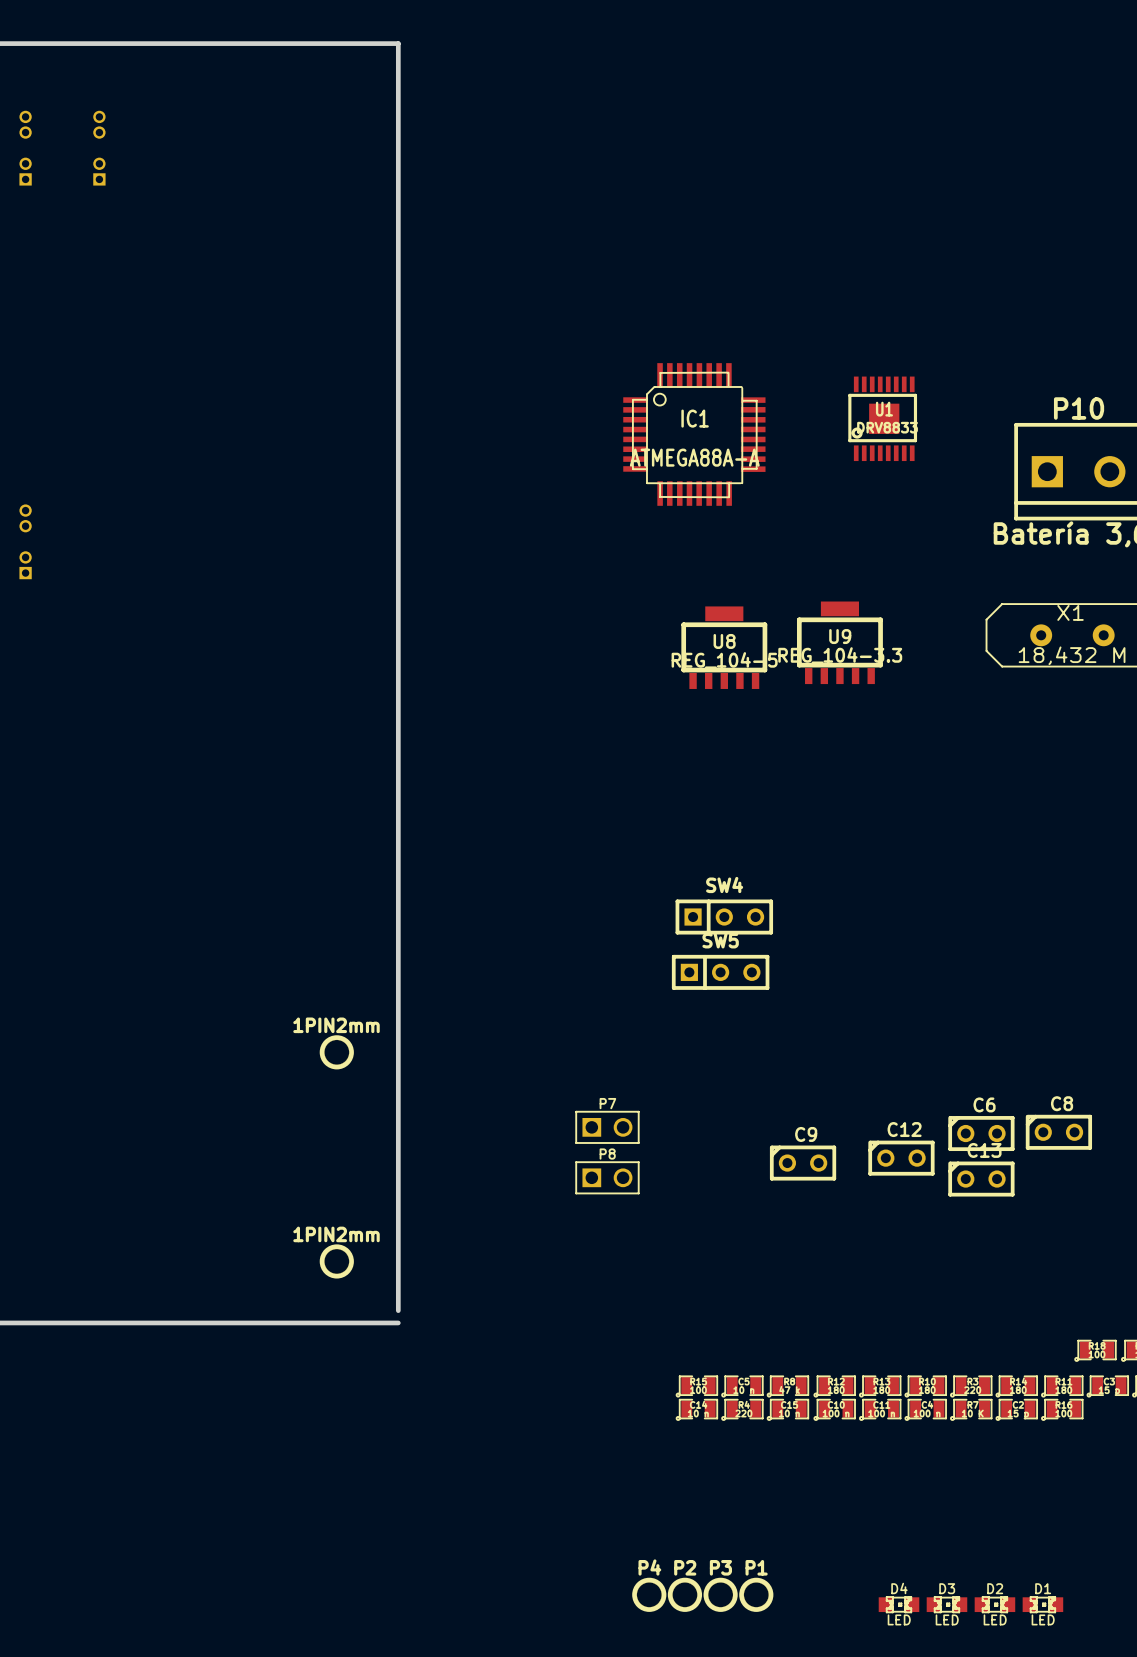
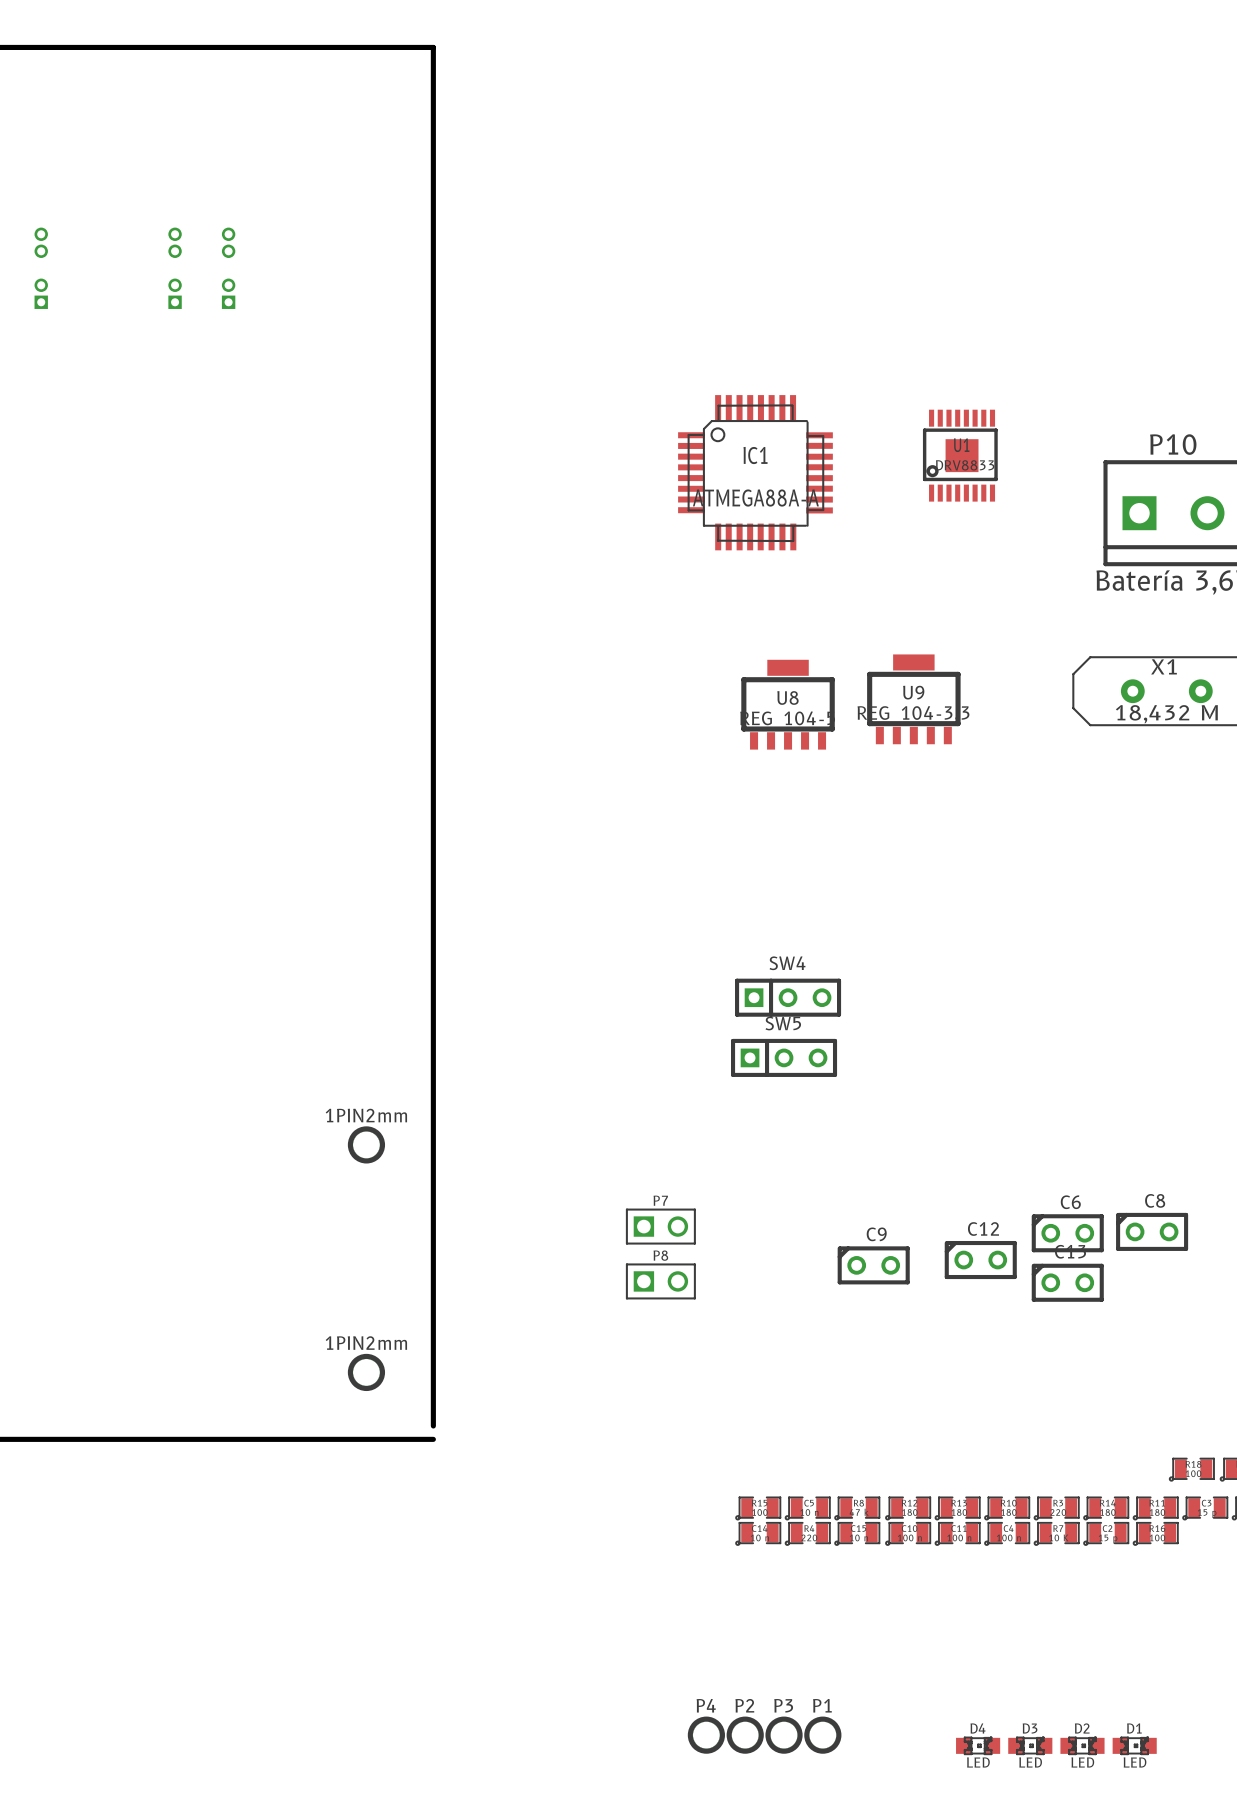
part: (25, 148) -> none
part: (99, 148) -> none
part: none -> (41, 268)
part: none -> (175, 268)
part: none -> (228, 268)
part: (25, 541) -> none

